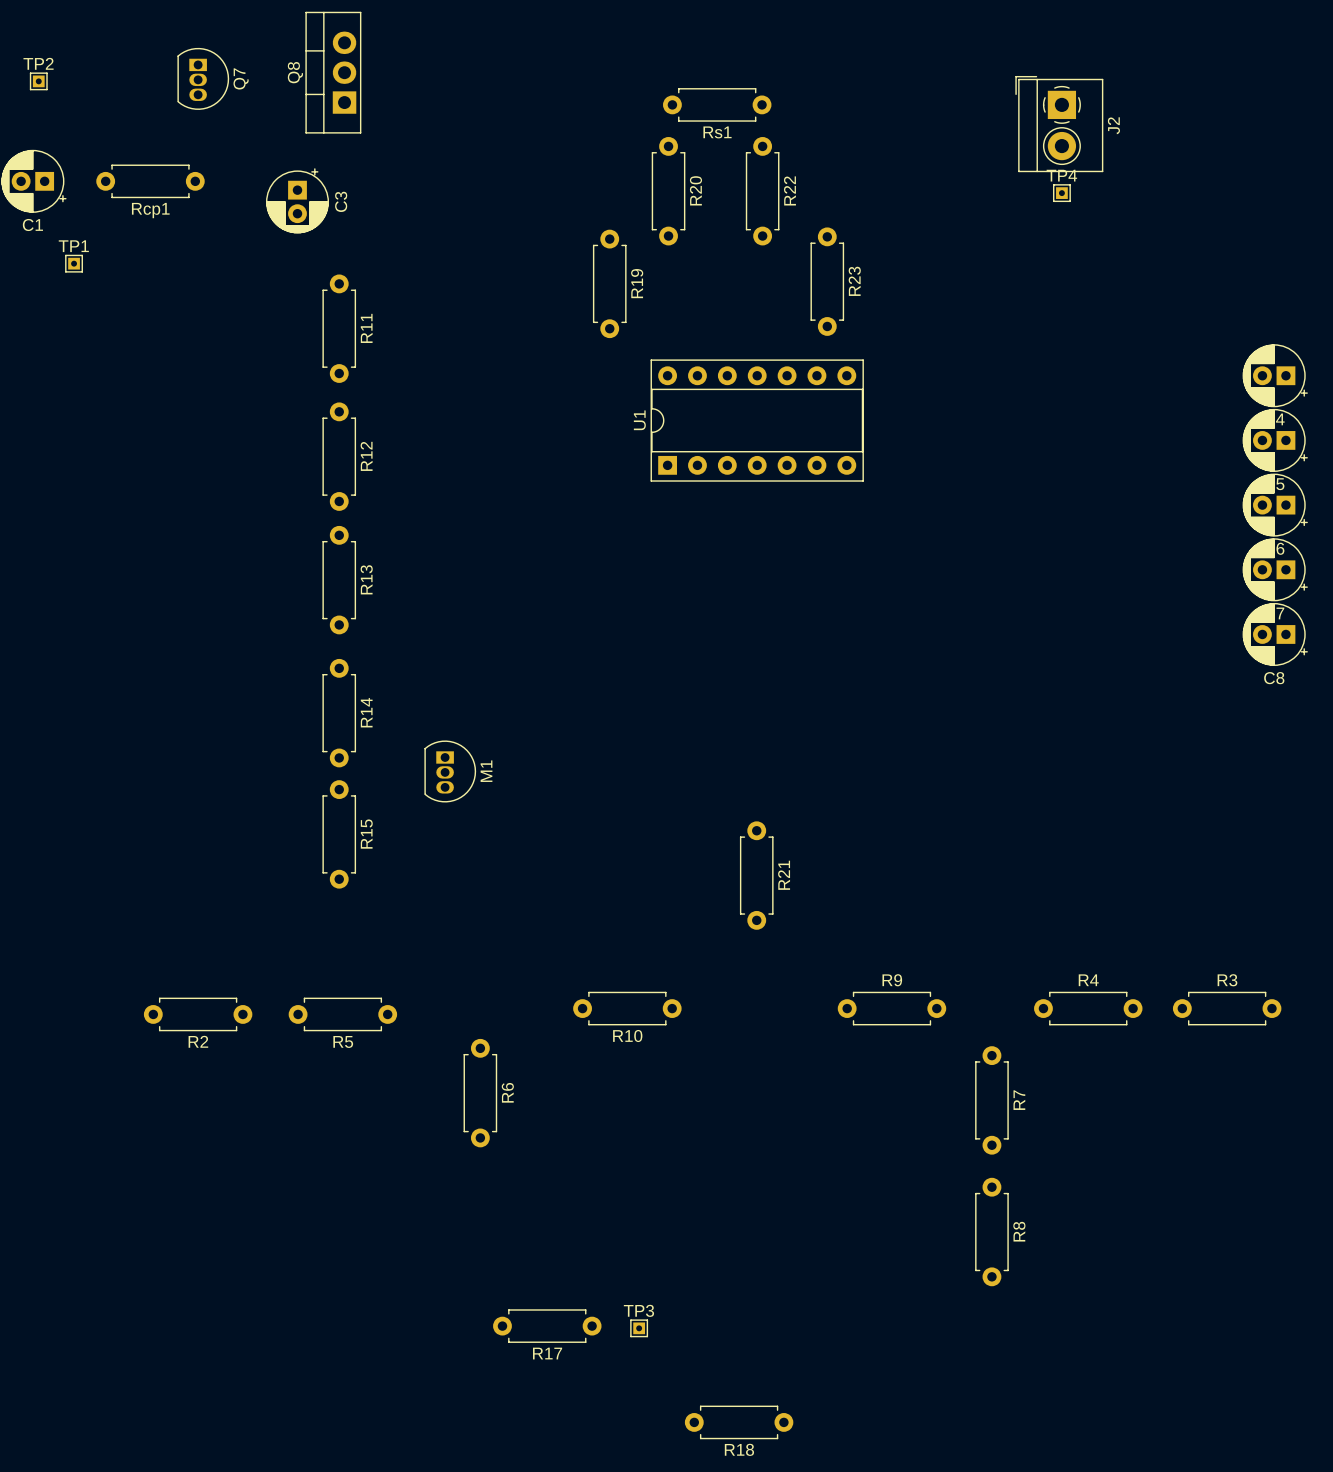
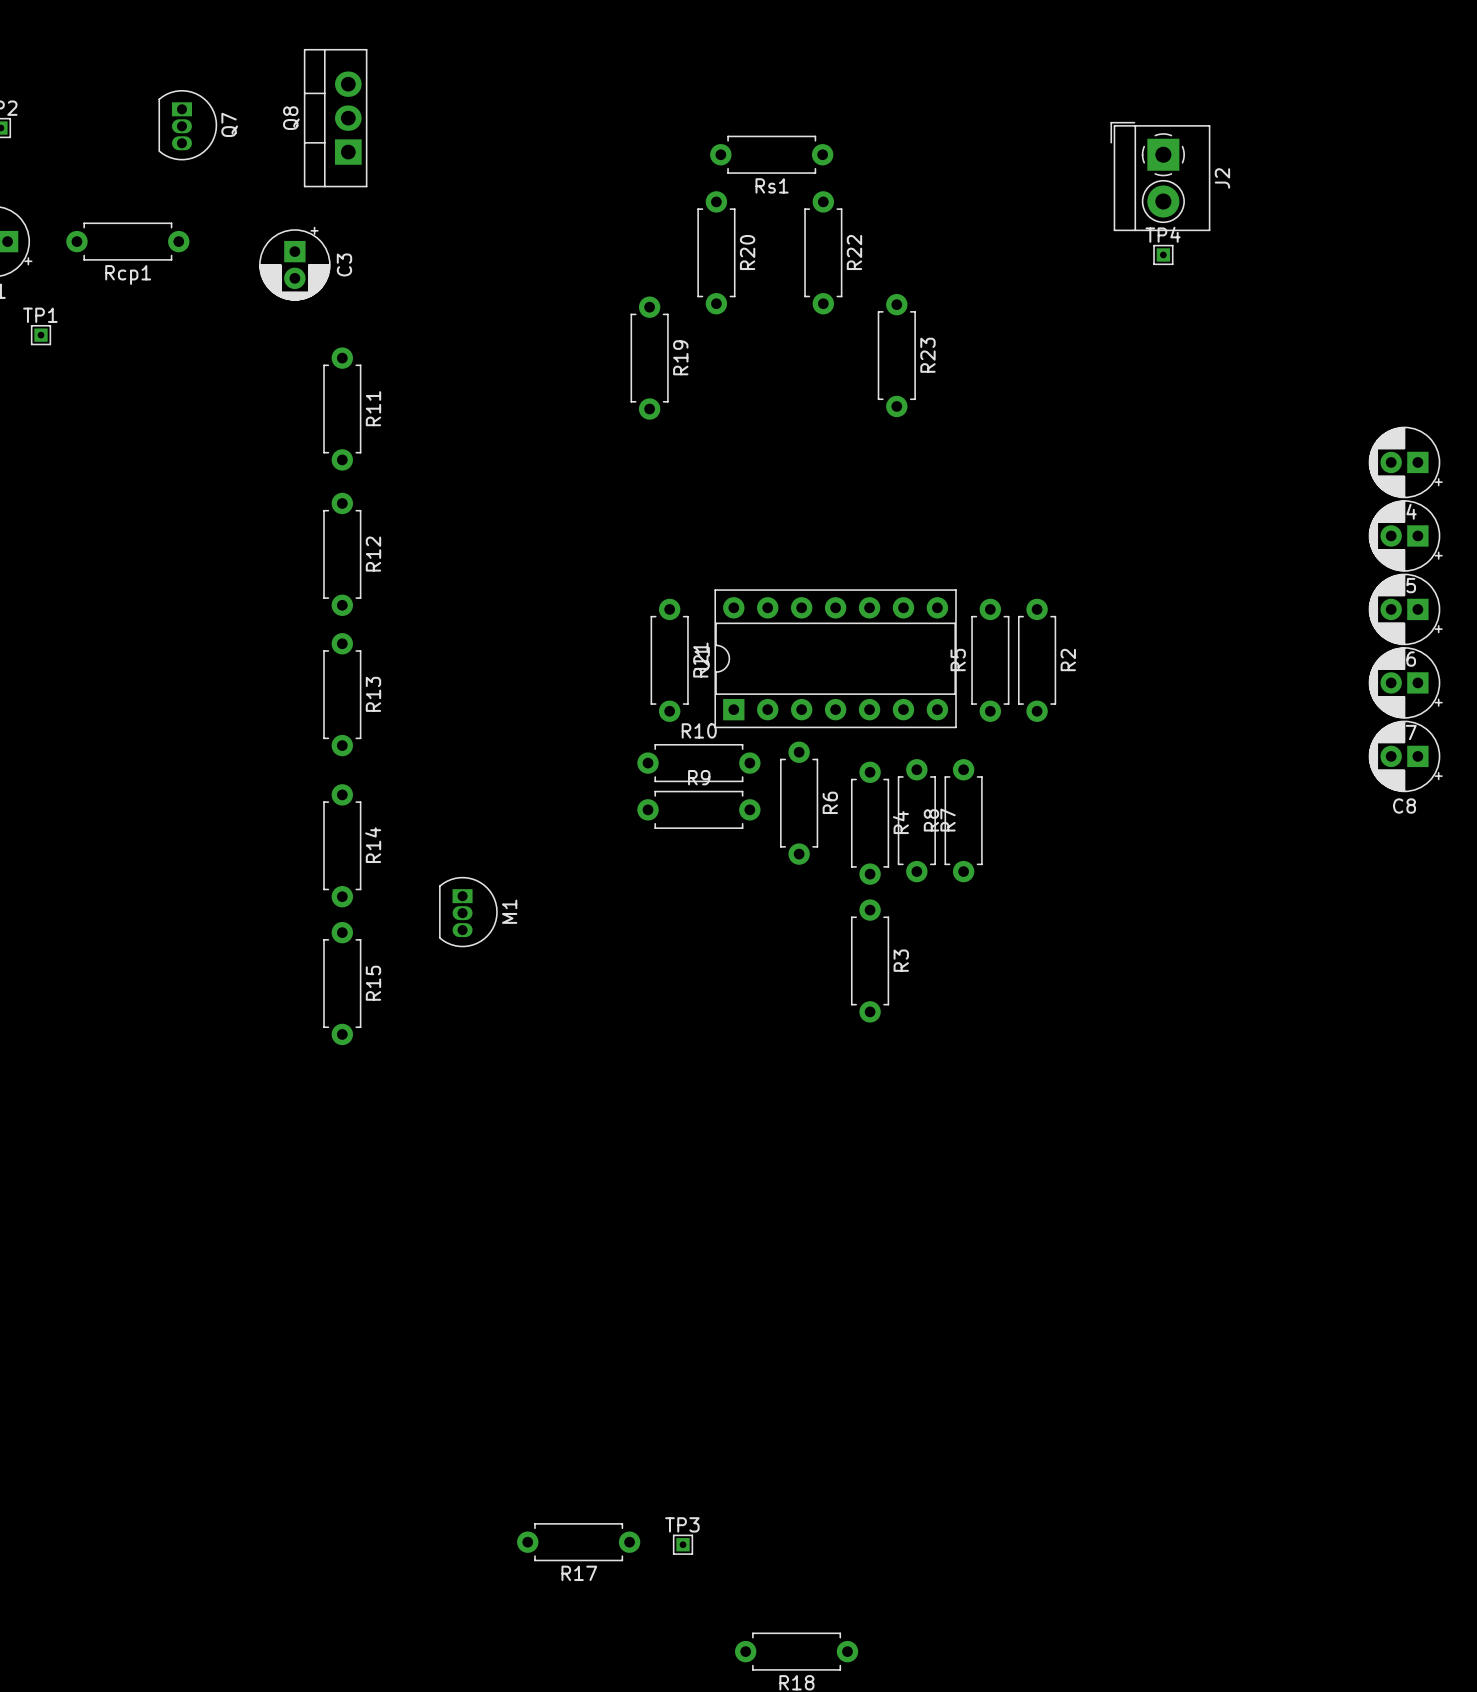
U1 position: (757, 420) -> (835, 658)
R21 position: (756, 875) -> (669, 660)
R10 position: (627, 1008) -> (698, 763)
R9 position: (891, 1008) -> (698, 809)
R4 rotation: 0° (1088, 1008) -> 90° clockwise (870, 823)
R4 position: (1088, 1008) -> (870, 823)
R3 rotation: 0° (1227, 1008) -> 90° clockwise (870, 960)
R3 position: (1227, 1008) -> (870, 960)
R2 rotation: 0° (198, 1014) -> 90° clockwise (1037, 660)
R2 position: (198, 1014) -> (1037, 660)
R5 rotation: 0° (342, 1014) -> 90° clockwise (990, 660)
R5 position: (342, 1014) -> (990, 660)
R10 name position: R10 (627, 1036) -> R10 (699, 730)
R2 name position: R2 (198, 1041) -> R2 (1068, 660)
R6 position: (480, 1093) -> (799, 803)
R7 position: (991, 1100) -> (916, 820)
R8 name position: R8 (1019, 1231) -> R8 (931, 820)
R8 position: (991, 1232) -> (963, 820)

